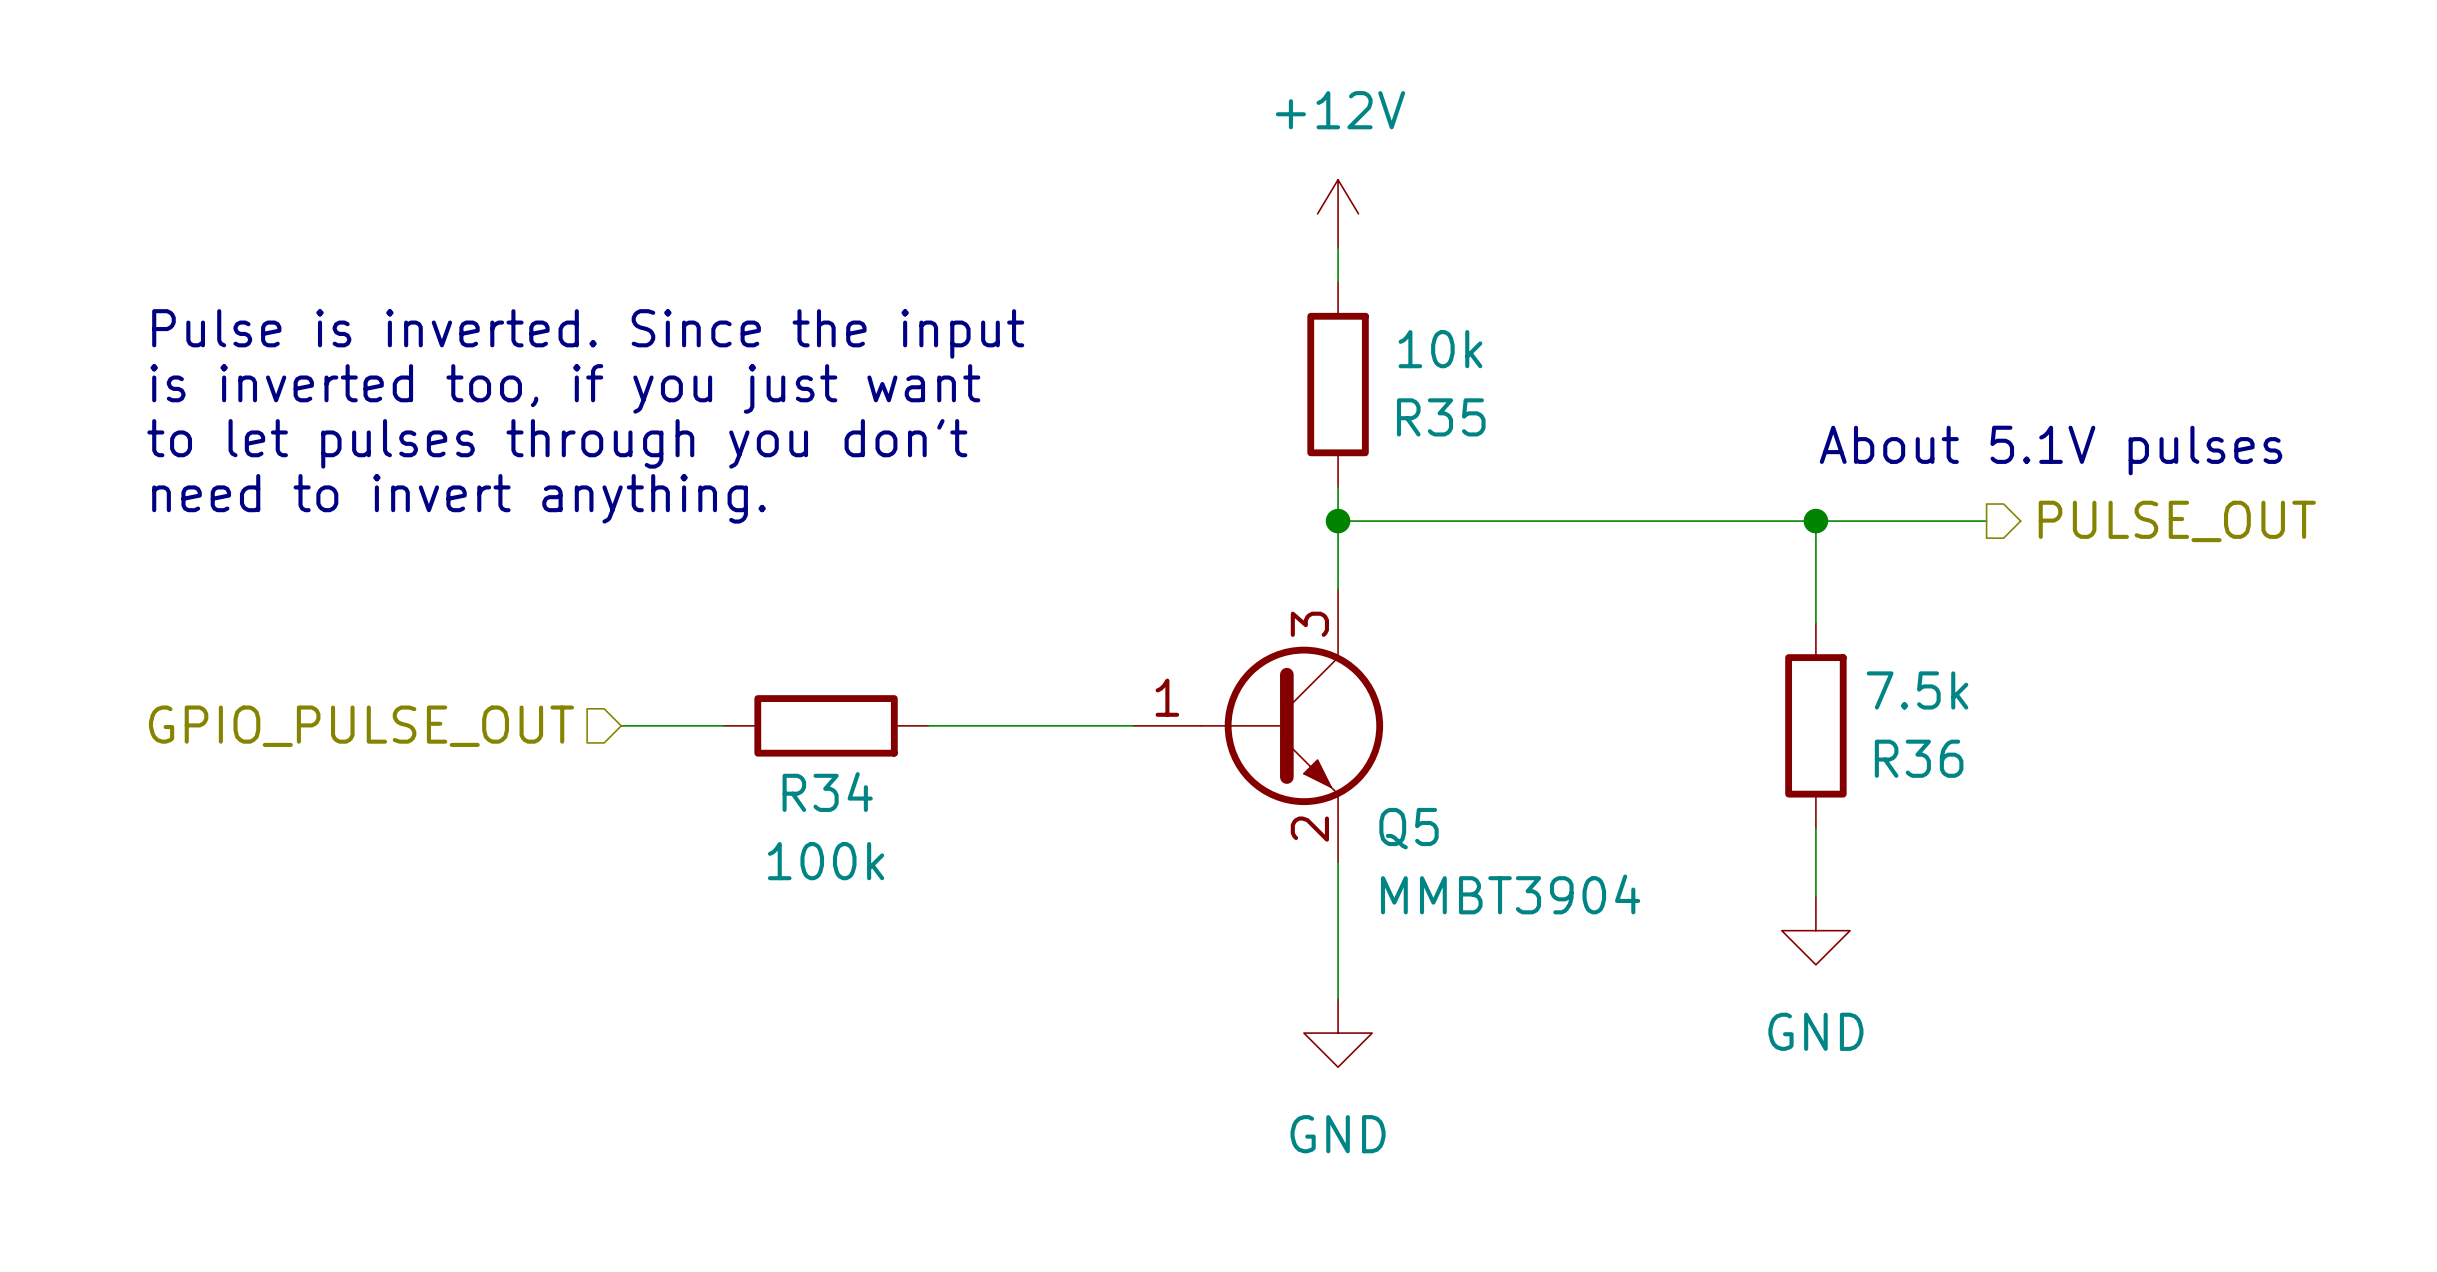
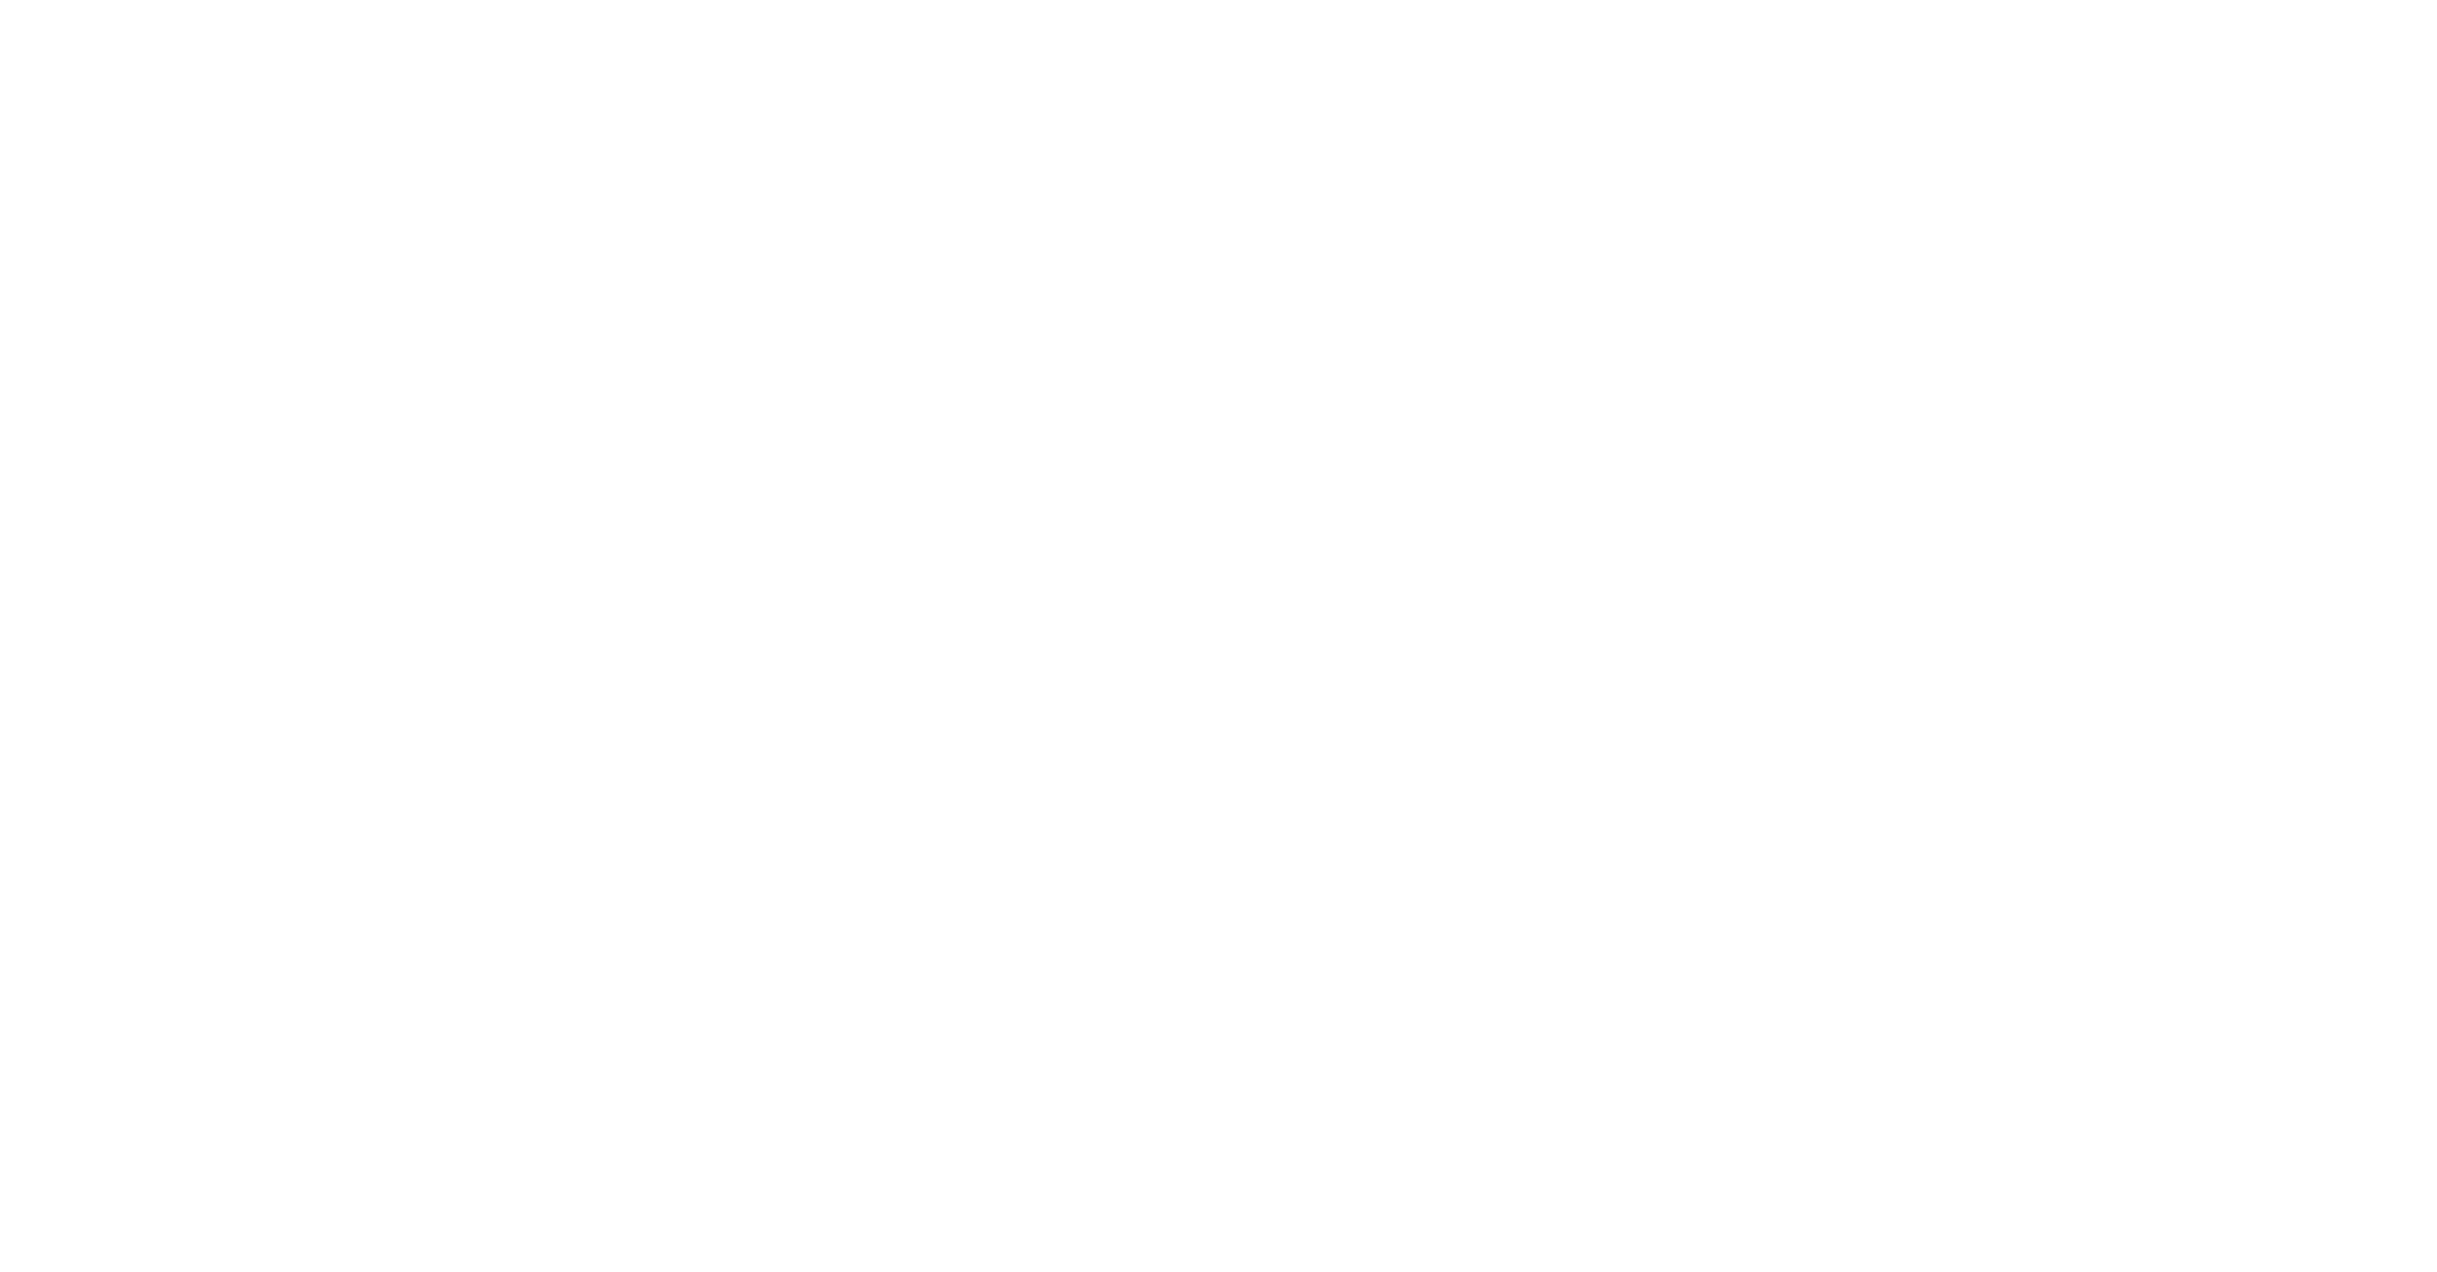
power symbol: +12V (1338, 213) -> none
wire: (1338, 248) (1338, 282) -> none
text: Pulse is inverted. Since the input (588, 333) -> none
R35: 10k (1338, 384) -> none
text: is inverted too, if you just want (565, 388) -> none
text: to let pulses through you don't (557, 443) -> none
text: About 5.1V pulses (2051, 450) -> none
wire: (1338, 486) (1338, 589) -> none
text: need to invert anything. (458, 498) -> none
wire: (1338, 521) (1986, 521) -> none
junction: (1338, 521) -> none
wire: (1815, 521) (1815, 623) -> none
junction: (1815, 521) -> none
hierarchical label: PULSE_OUT (2177, 521) -> none
wire: (621, 725) (723, 725) -> none
R34: 100k (826, 725) -> none
wire: (928, 725) (1133, 725) -> none
Q5: MMBT3904 (1258, 725) -> none
R36: 7.5k (1815, 725) -> none
hierarchical label: GPIO_PULSE_OUT (361, 726) -> none
wire: (1815, 828) (1815, 896) -> none
wire: (1338, 862) (1338, 998) -> none
power symbol: GND (1815, 930) -> none
power symbol: GND (1338, 1033) -> none

